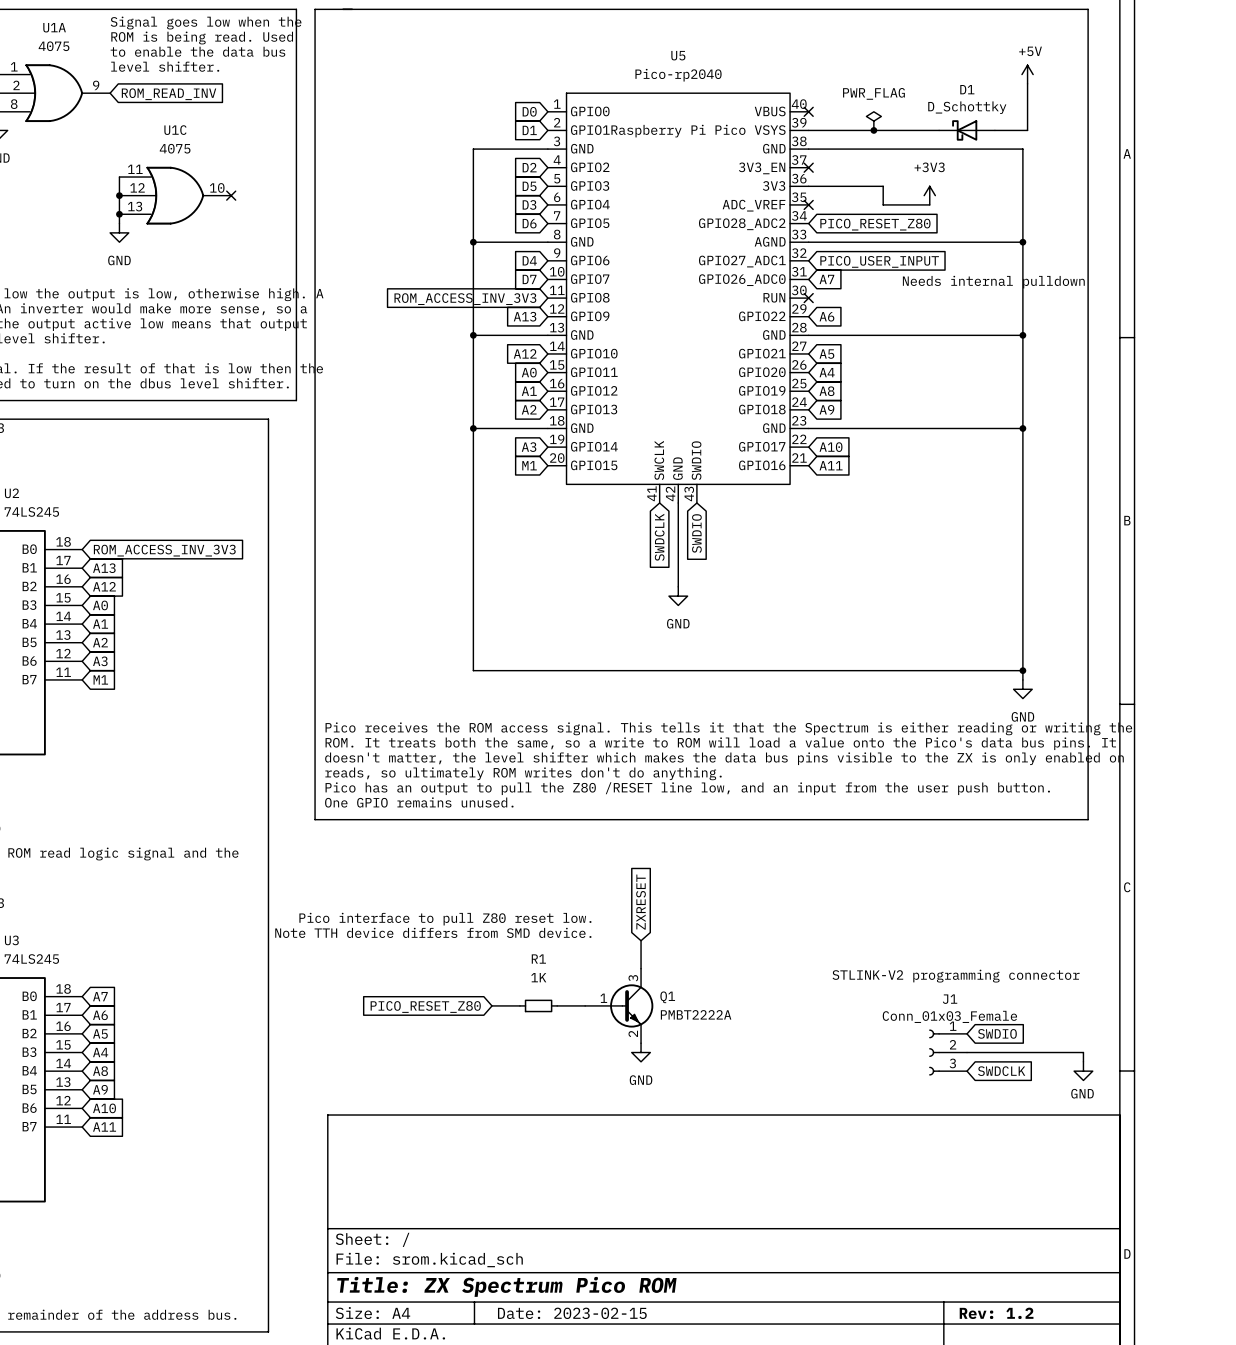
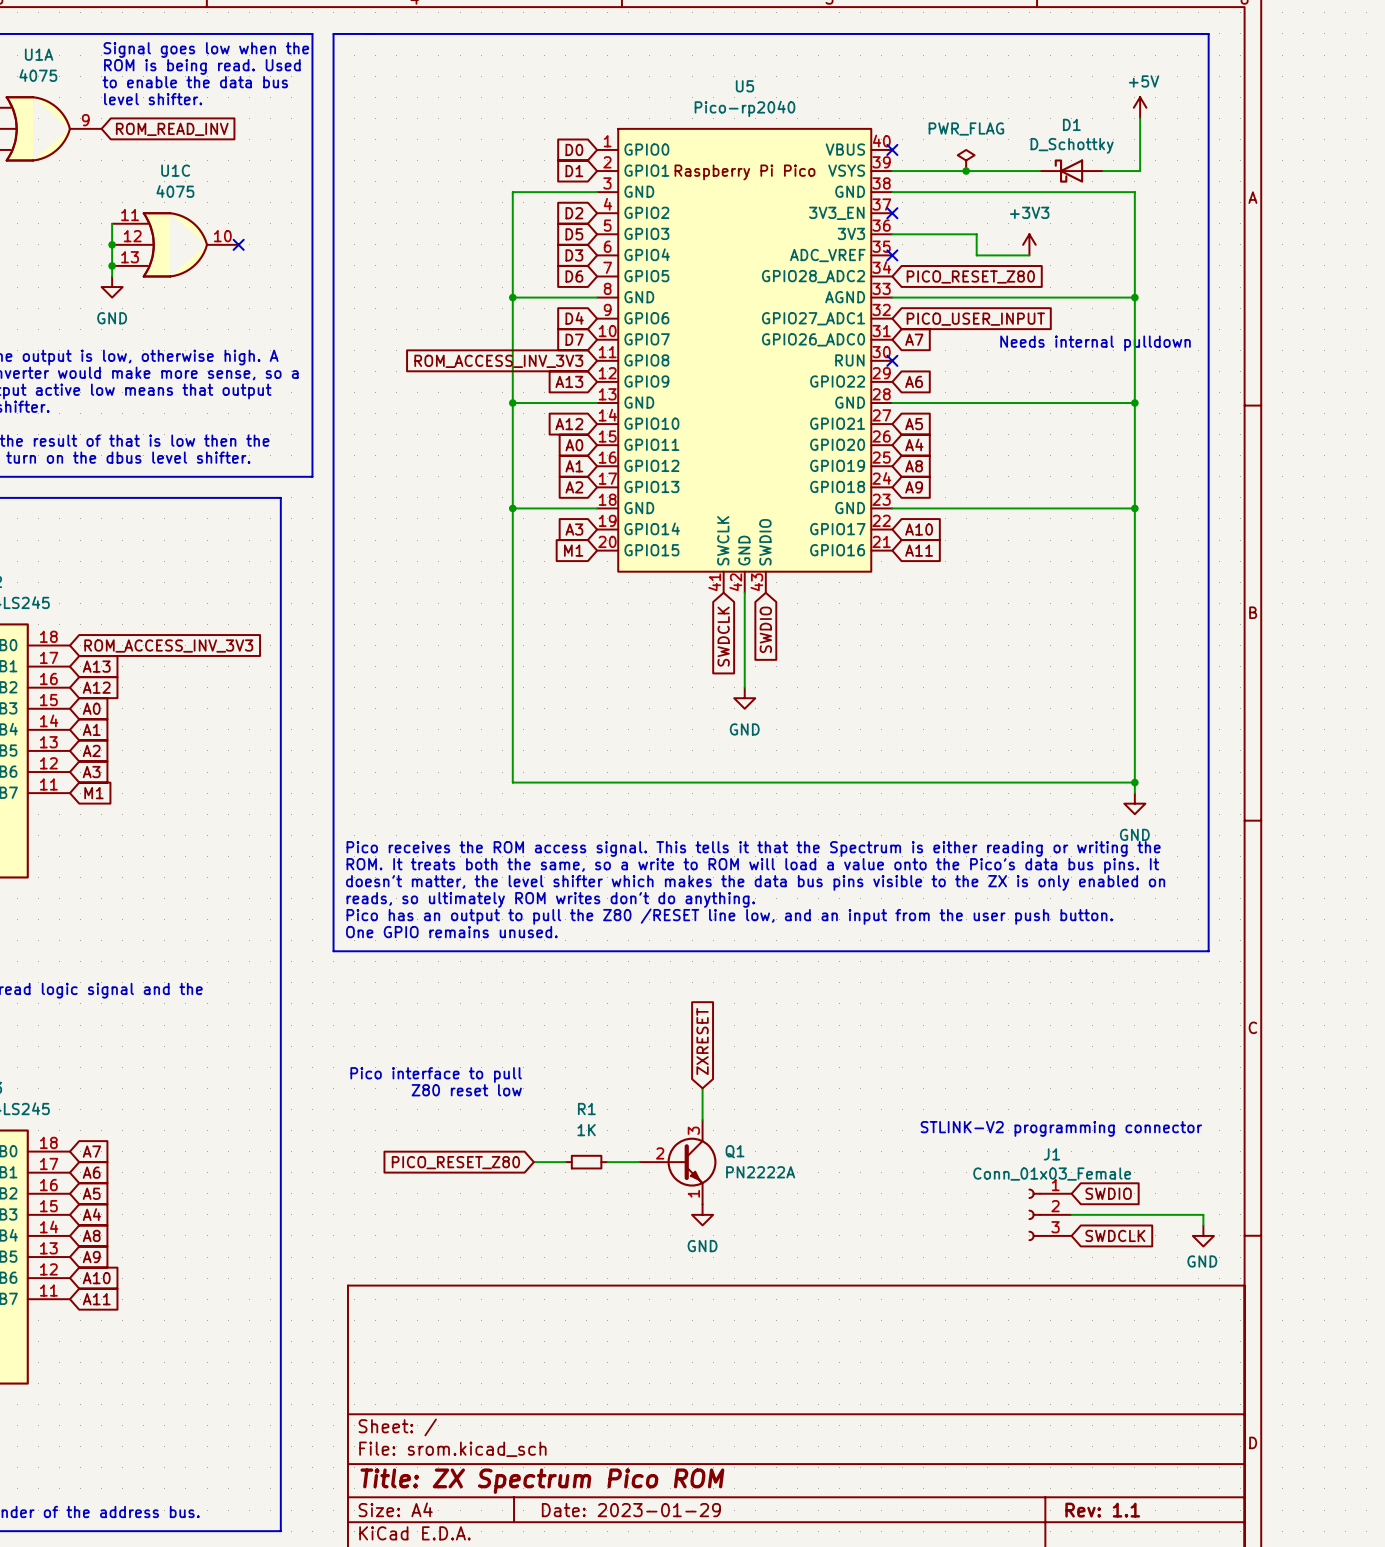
text: Pico interface to pull Z80 reset low. (445, 919) -> Pico interface to pull (436, 1075)
text: Note TTH device differs from SMD device. (433, 932) -> none
text: none -> Z80 reset low (466, 1090)
Q1 pin number: 1 (603, 998) -> 2 (660, 1153)
Q1 value: PMBT2222A (696, 1014) -> PN2222A (760, 1172)
Q1 pin number: 2 (633, 1033) -> 1 (693, 1193)
title block: Date: 2023-02-15 (572, 1313) -> Date: 2023-01-29 (631, 1510)
title block: Rev: 1.2 (996, 1313) -> Rev: 1.1 (1102, 1510)

